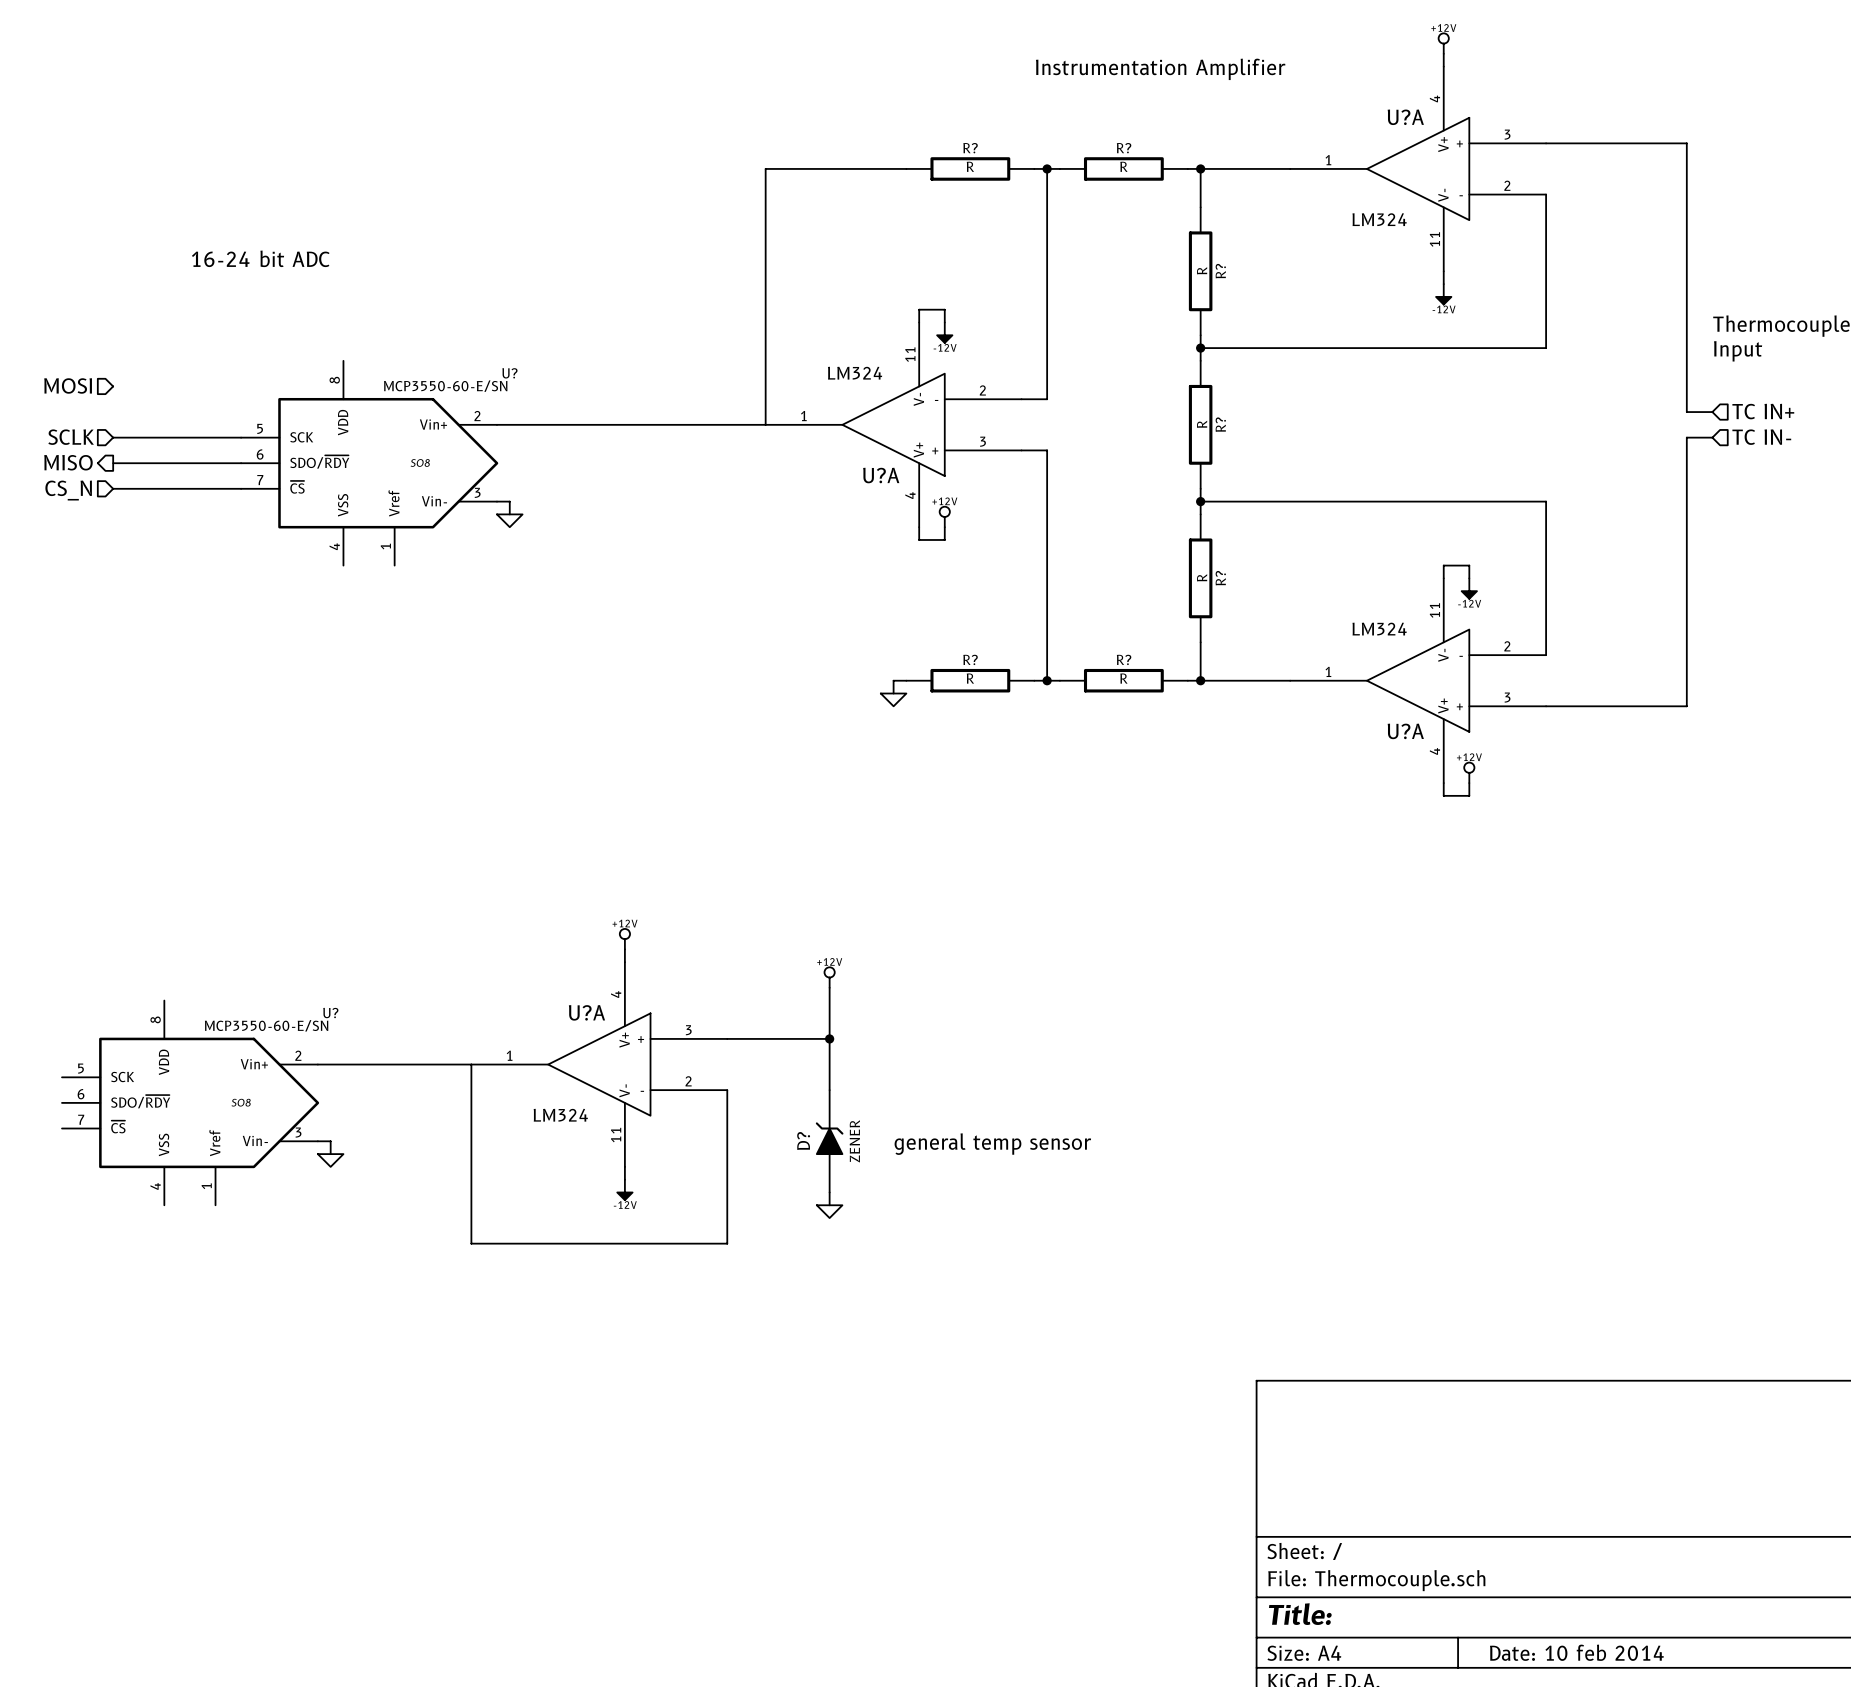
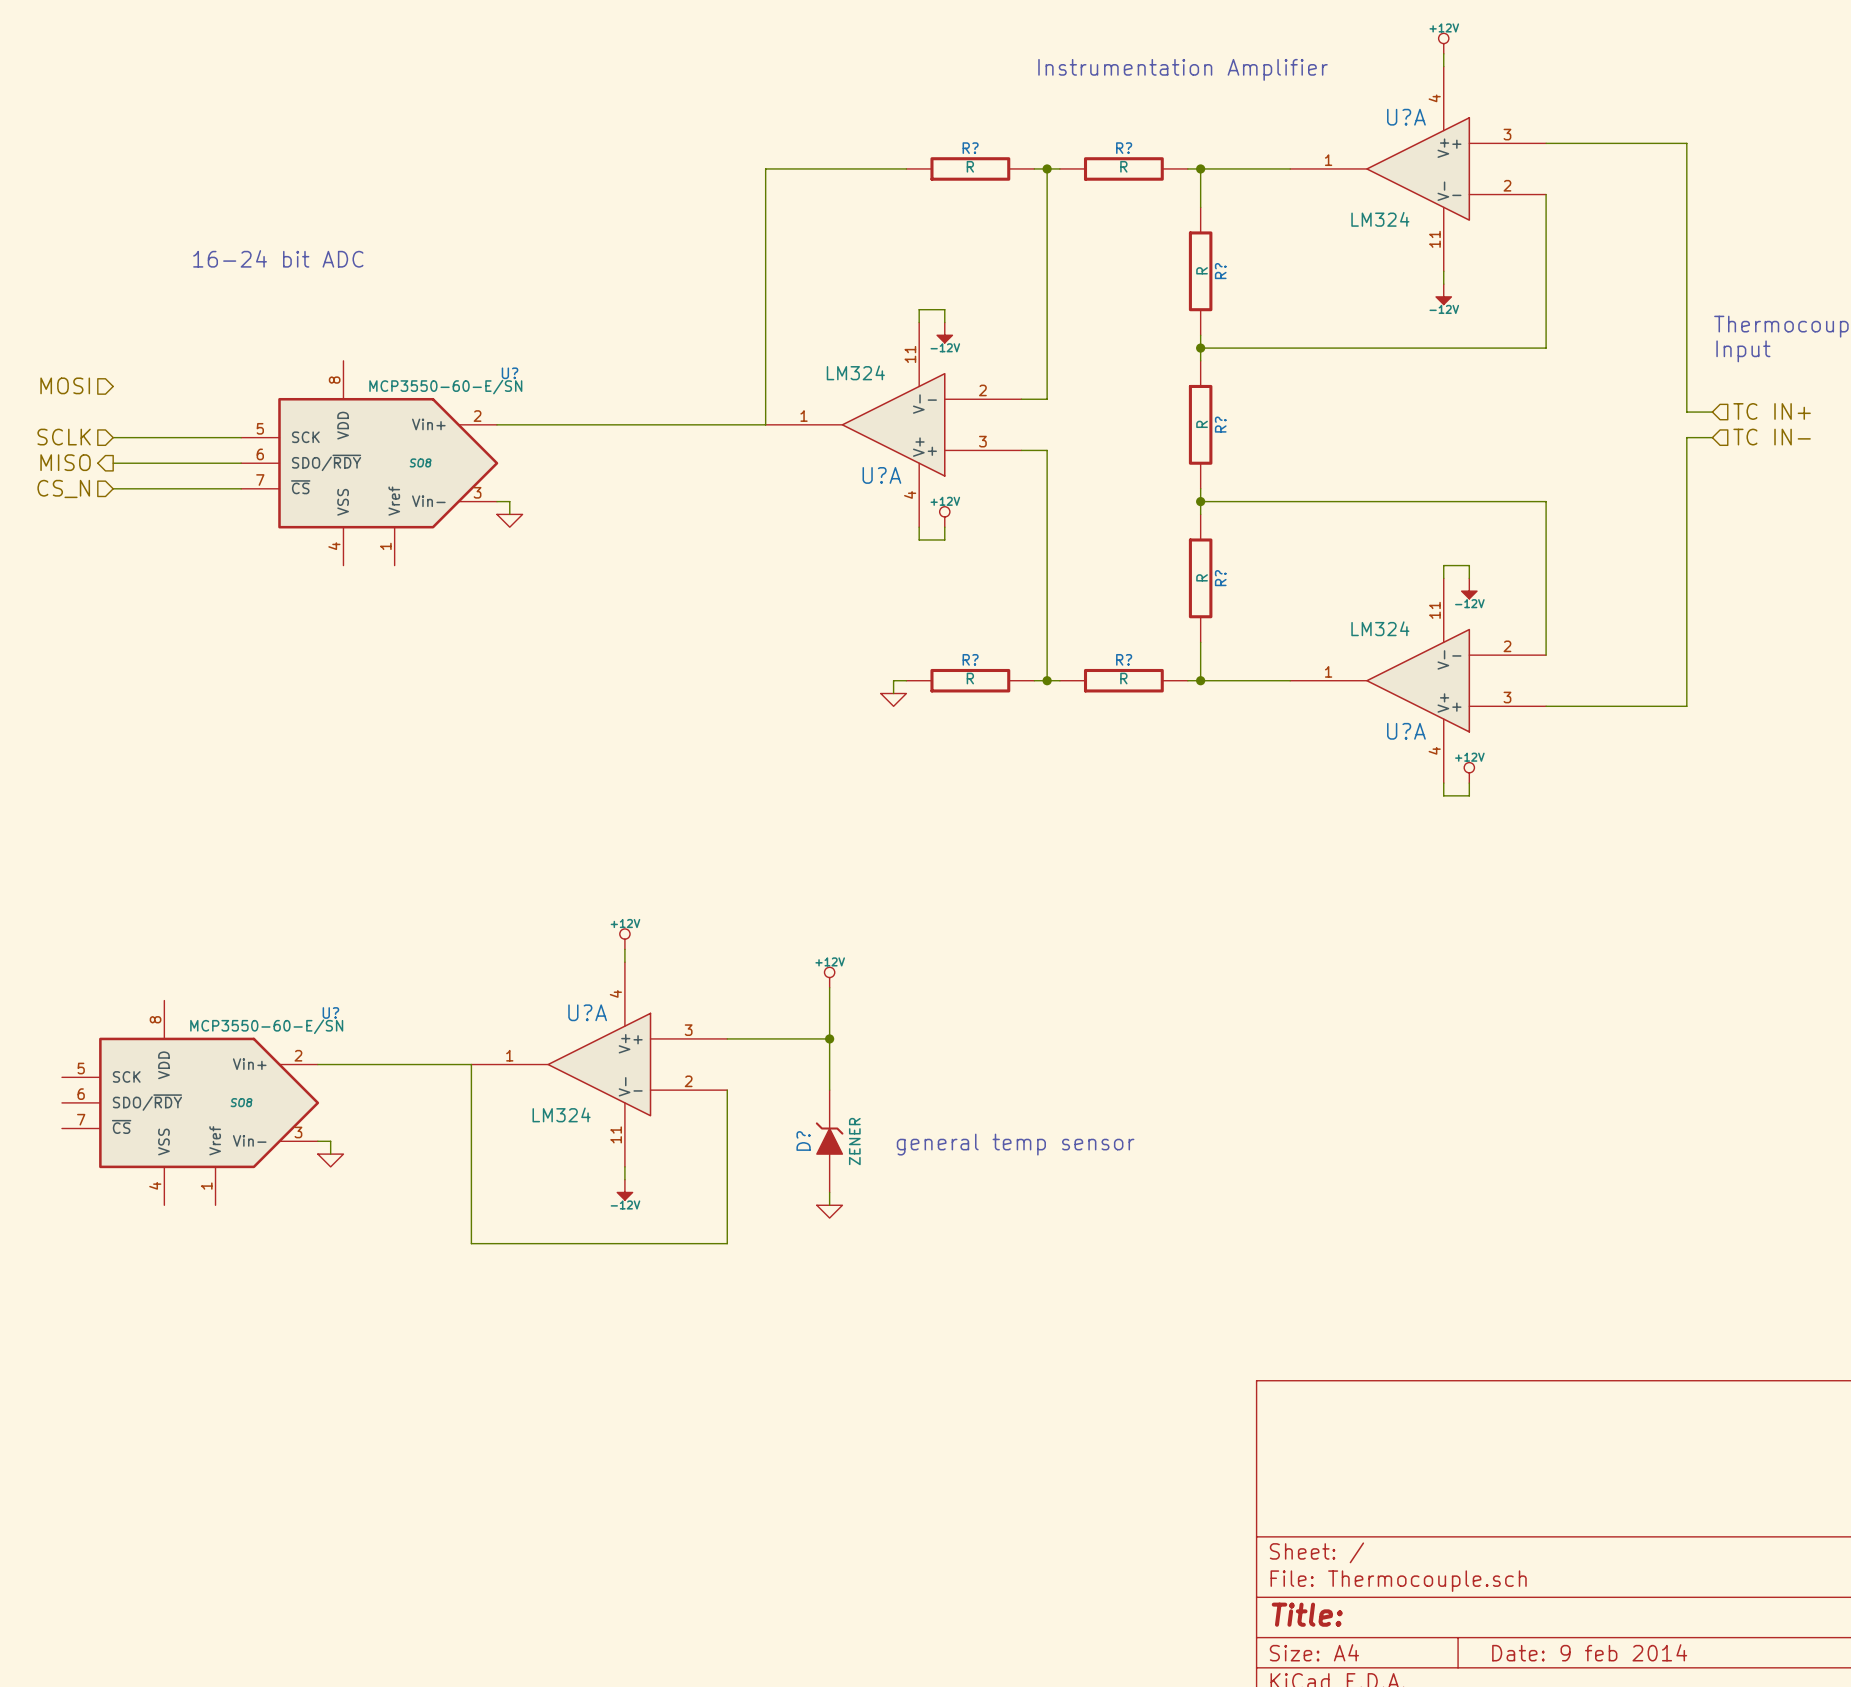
title block: Date: 10 feb 2014 (1576, 1652) -> Date: 9 feb 2014 (1589, 1652)

